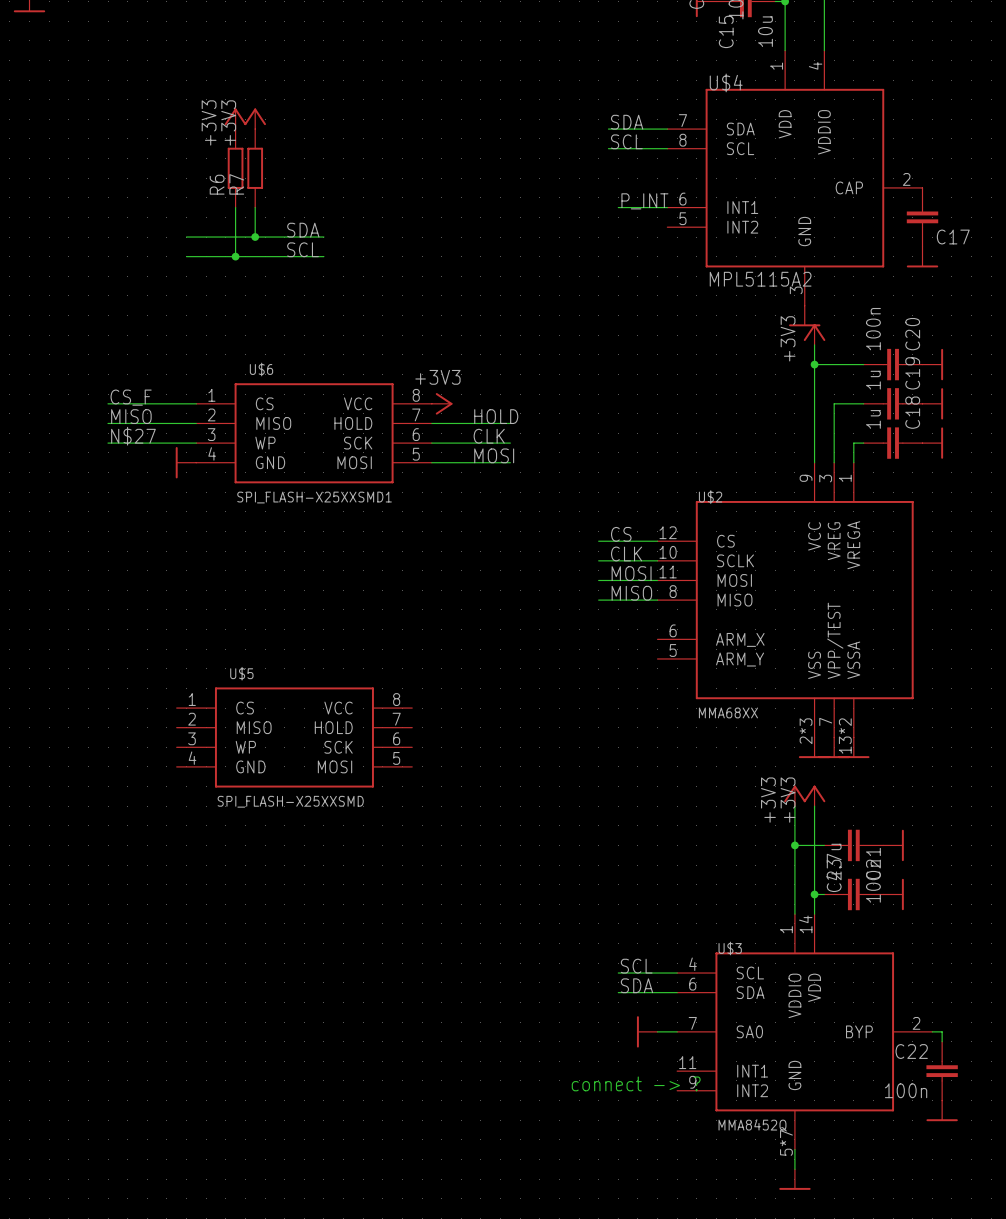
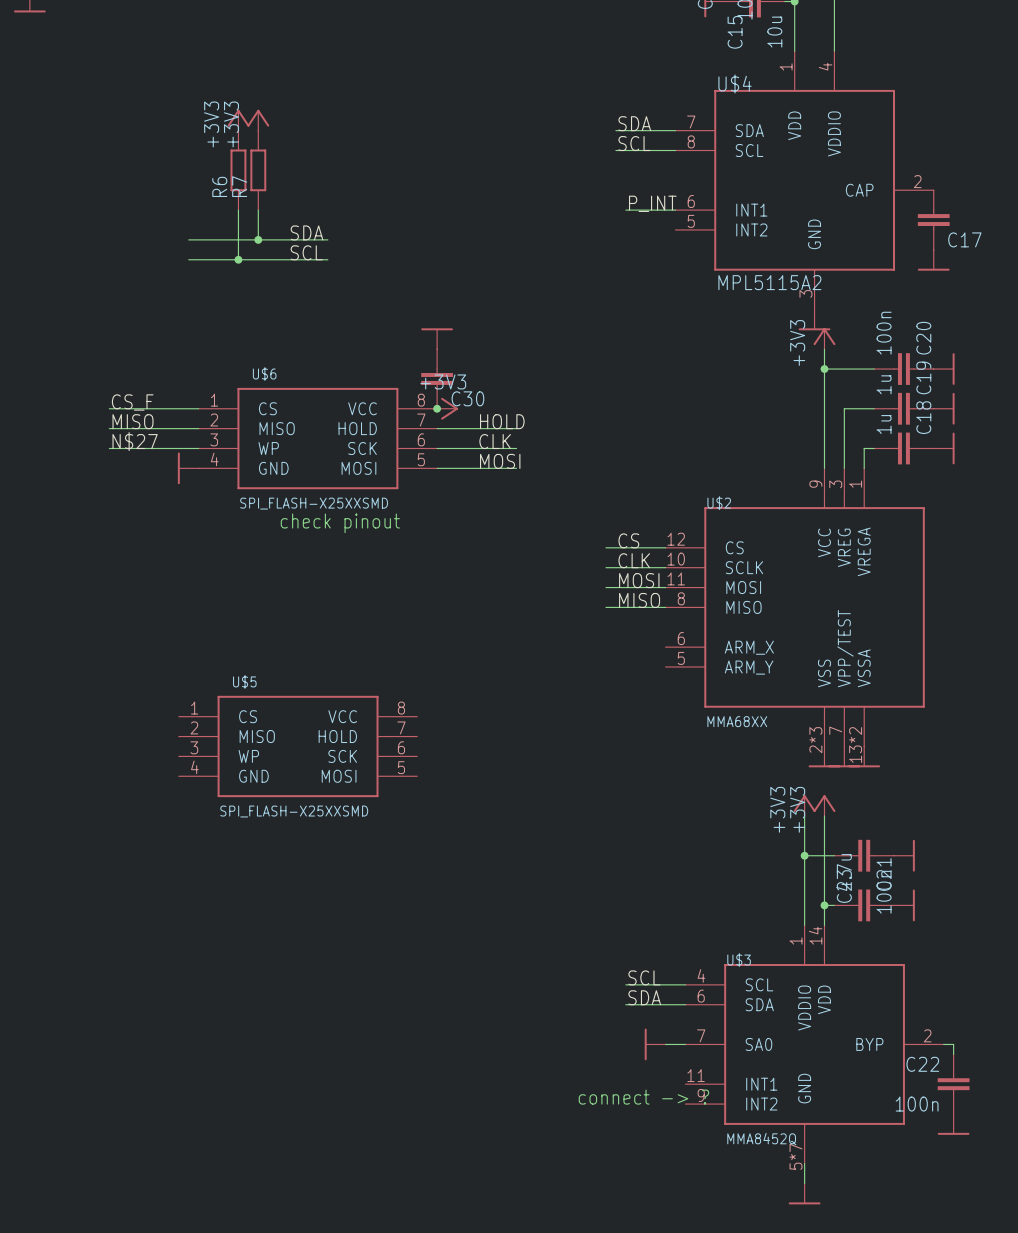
power symbol: none -> (437, 338)
C30: none -> (437, 378)
junction: none -> (437, 408)
U$6 value: SPI_FLASH-X25XXSMD1 (314, 497) -> SPI_FLASH-X25XXSMD (314, 503)
text: none -> check pinout (340, 523)

